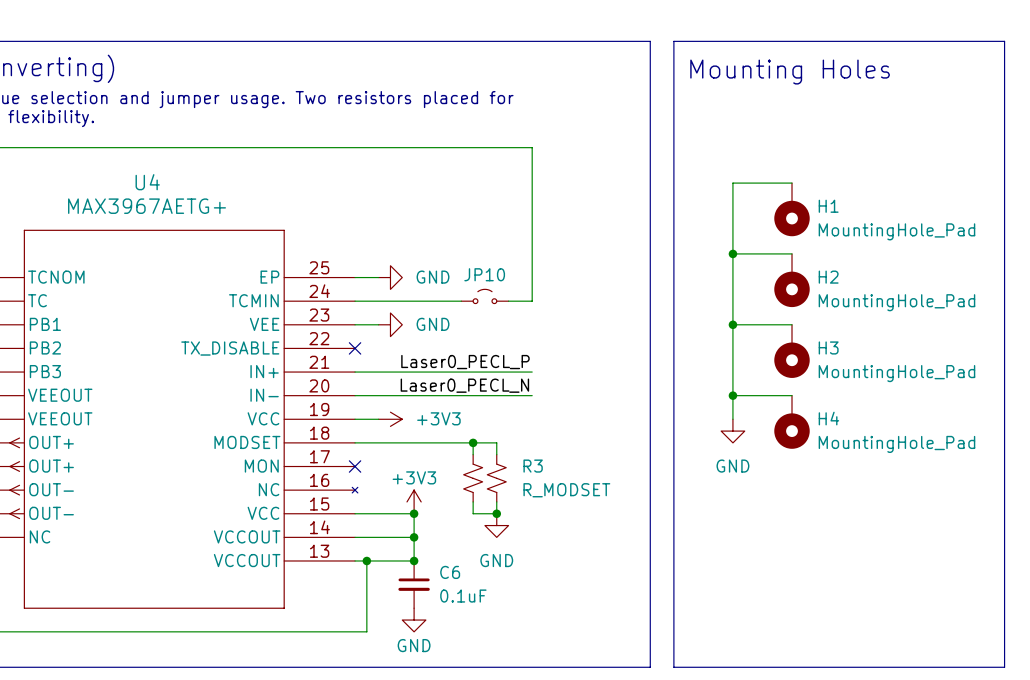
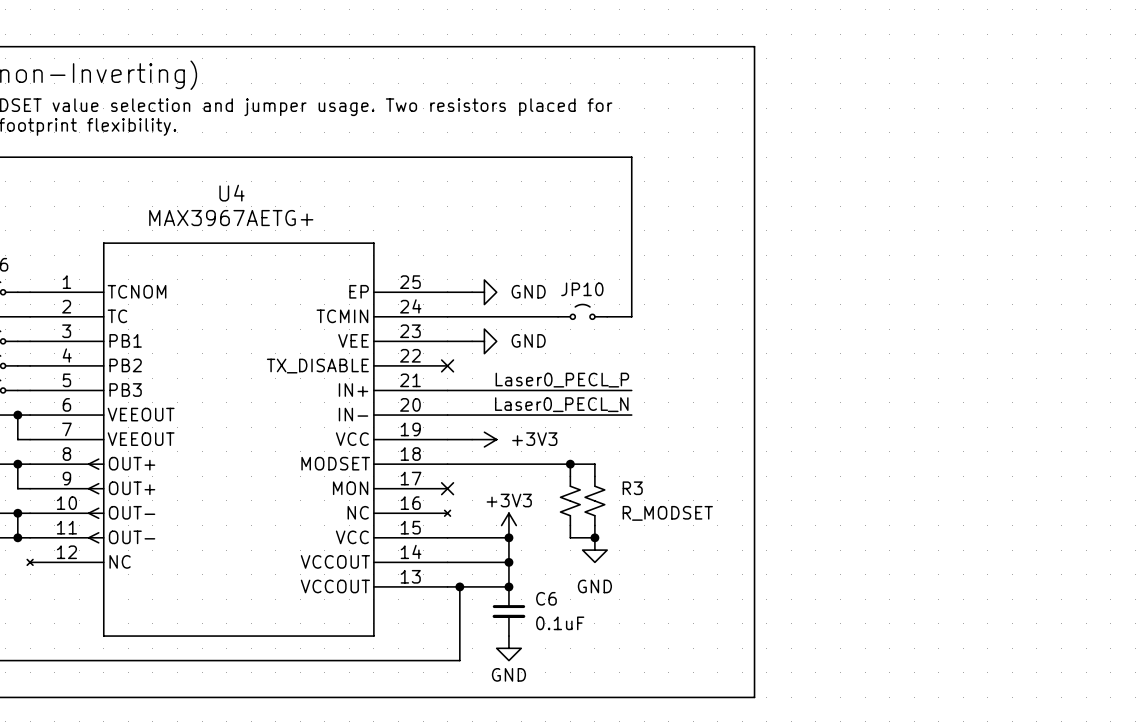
line: (673, 41) (1004, 41) (1004, 667) (673, 667) (673, 41) -> none
text: Mounting Holes (790, 72) -> none
wire: (792, 183) (732, 183) (732, 419) -> none
H1: MountingHole_Pad (792, 209) -> none
wire: (732, 253) (792, 253) -> none
junction: (732, 253) -> none
H2: MountingHole_Pad (792, 280) -> none
wire: (732, 324) (792, 324) -> none
junction: (732, 324) -> none
H3: MountingHole_Pad (792, 351) -> none
wire: (732, 395) (792, 395) -> none
junction: (732, 395) -> none
H4: MountingHole_Pad (792, 422) -> none
power symbol: GND (732, 431) -> none

